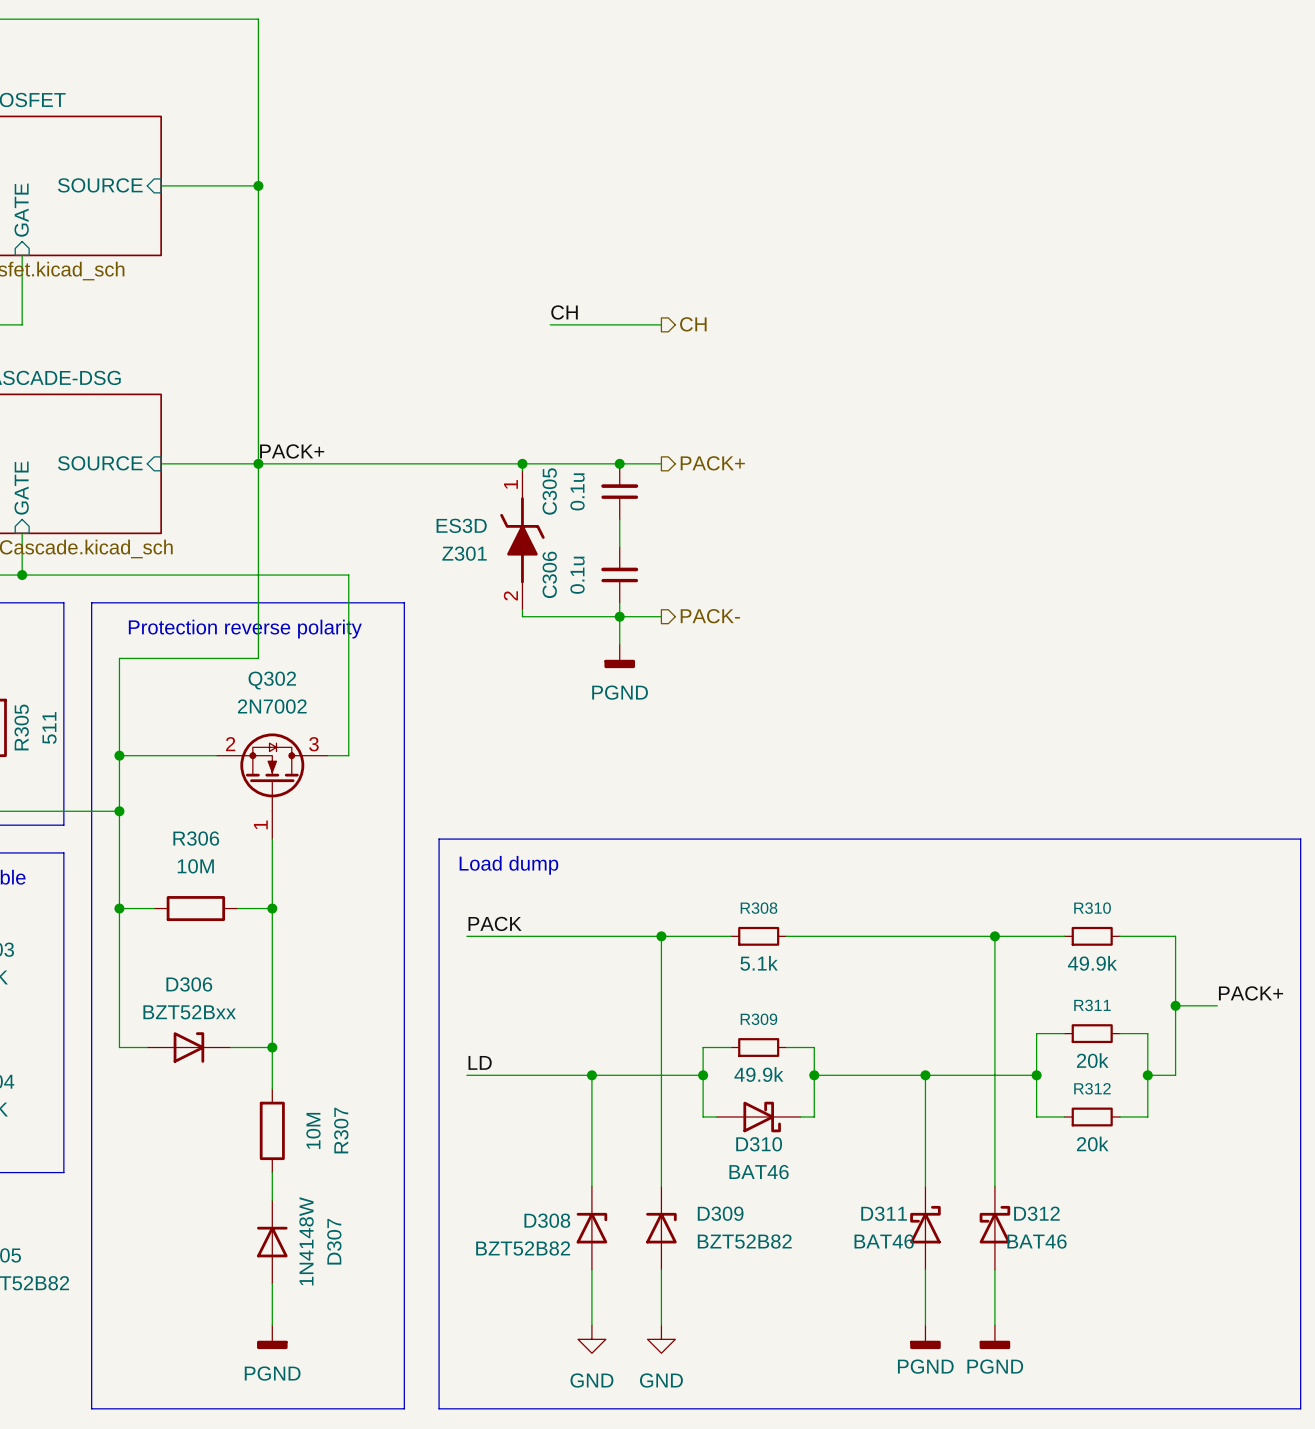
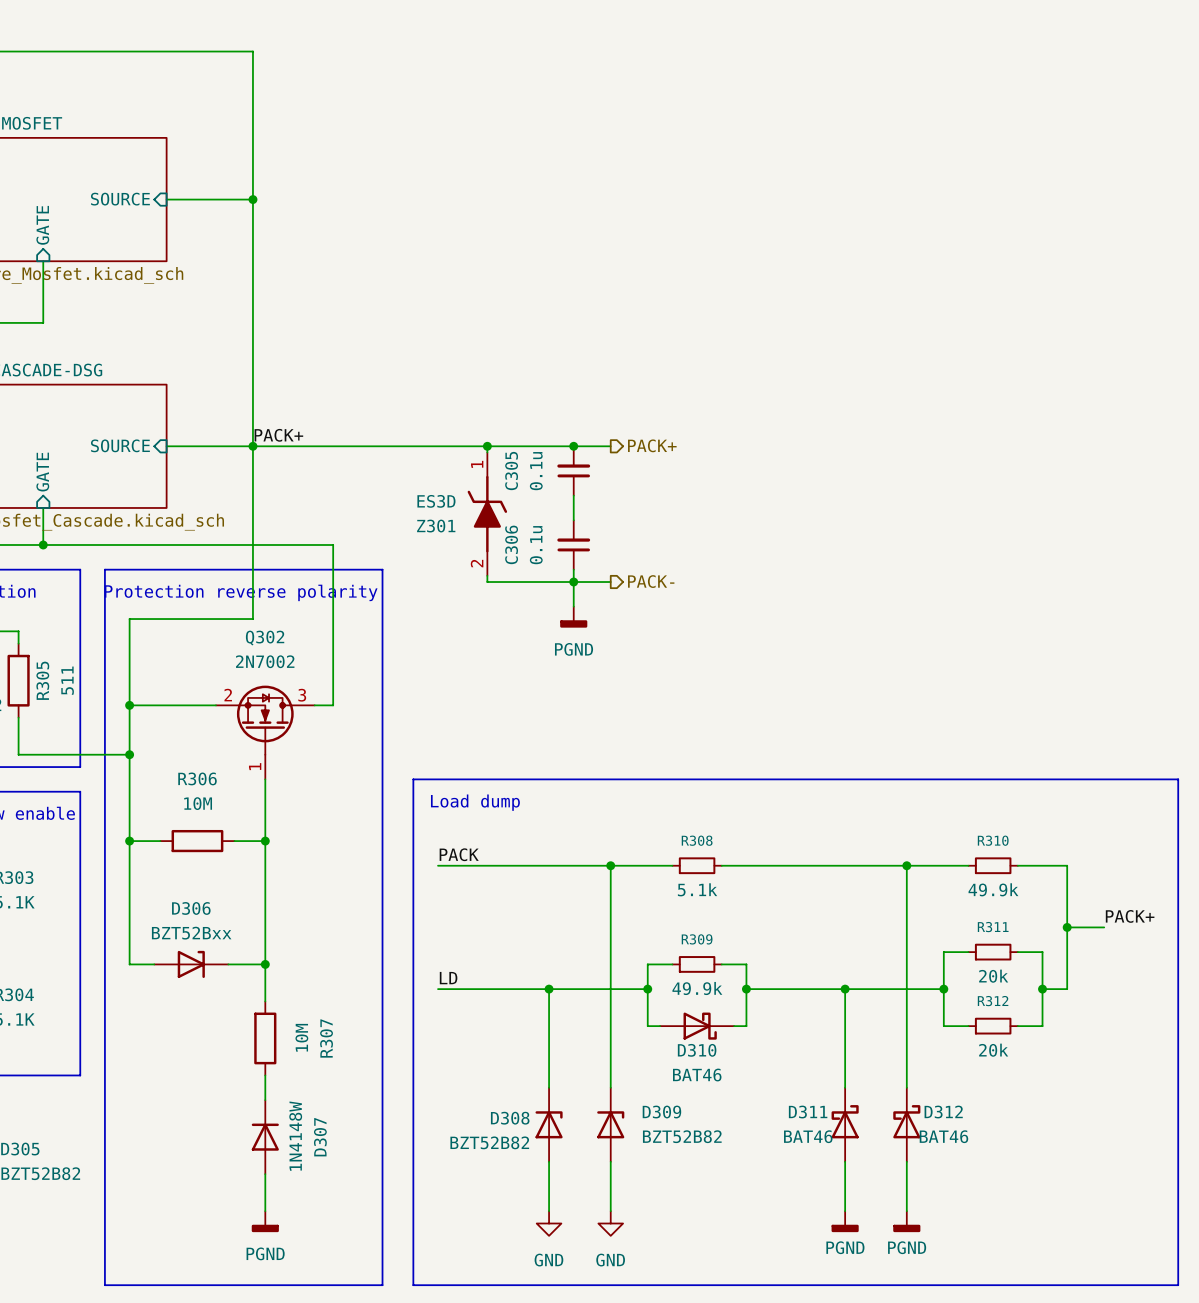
label: CH (564, 312) -> none
wire: (550, 324) (661, 324) -> none
hierarchical label: CH (693, 324) -> none

